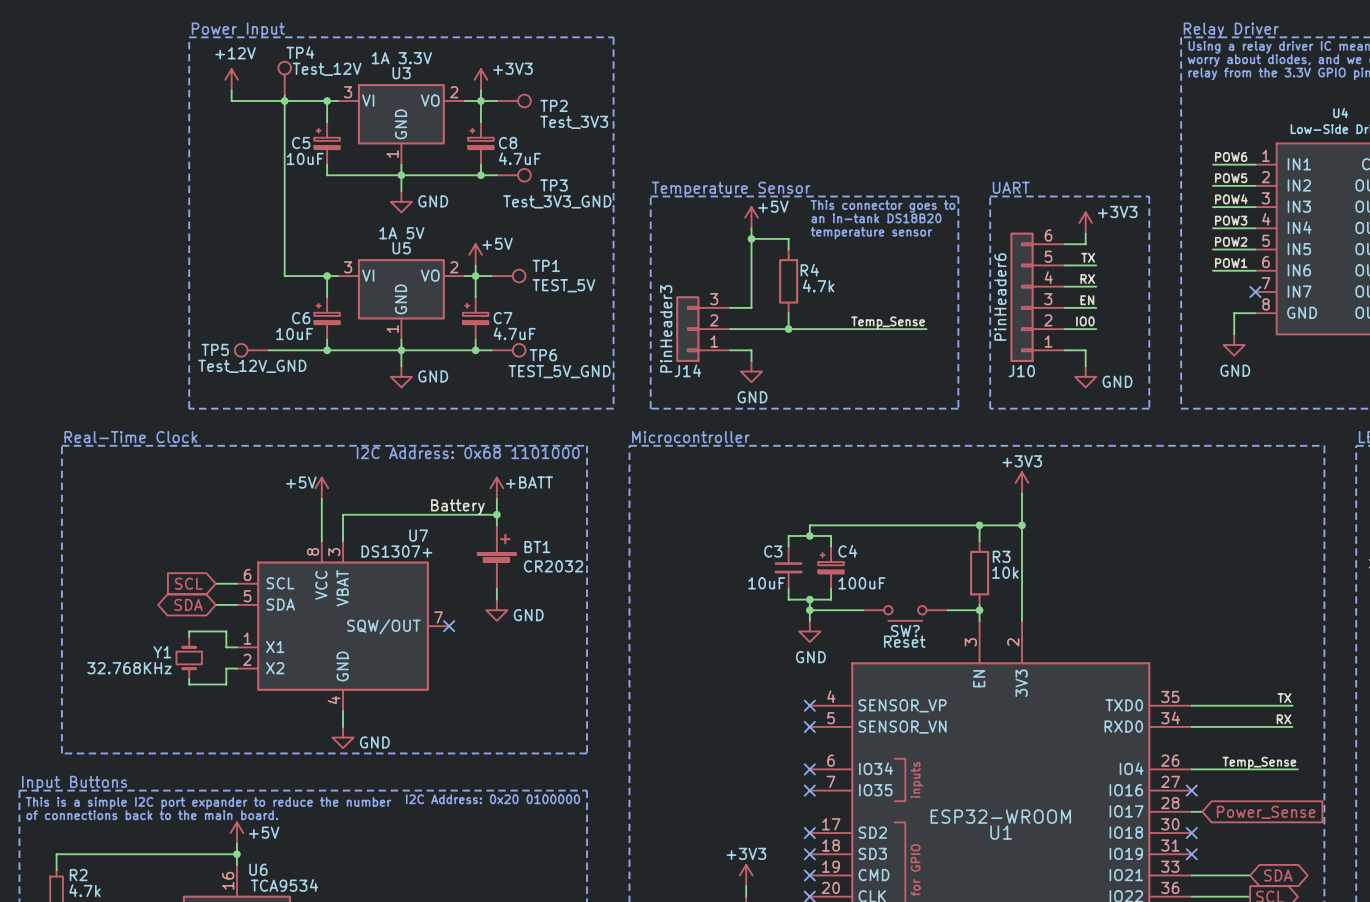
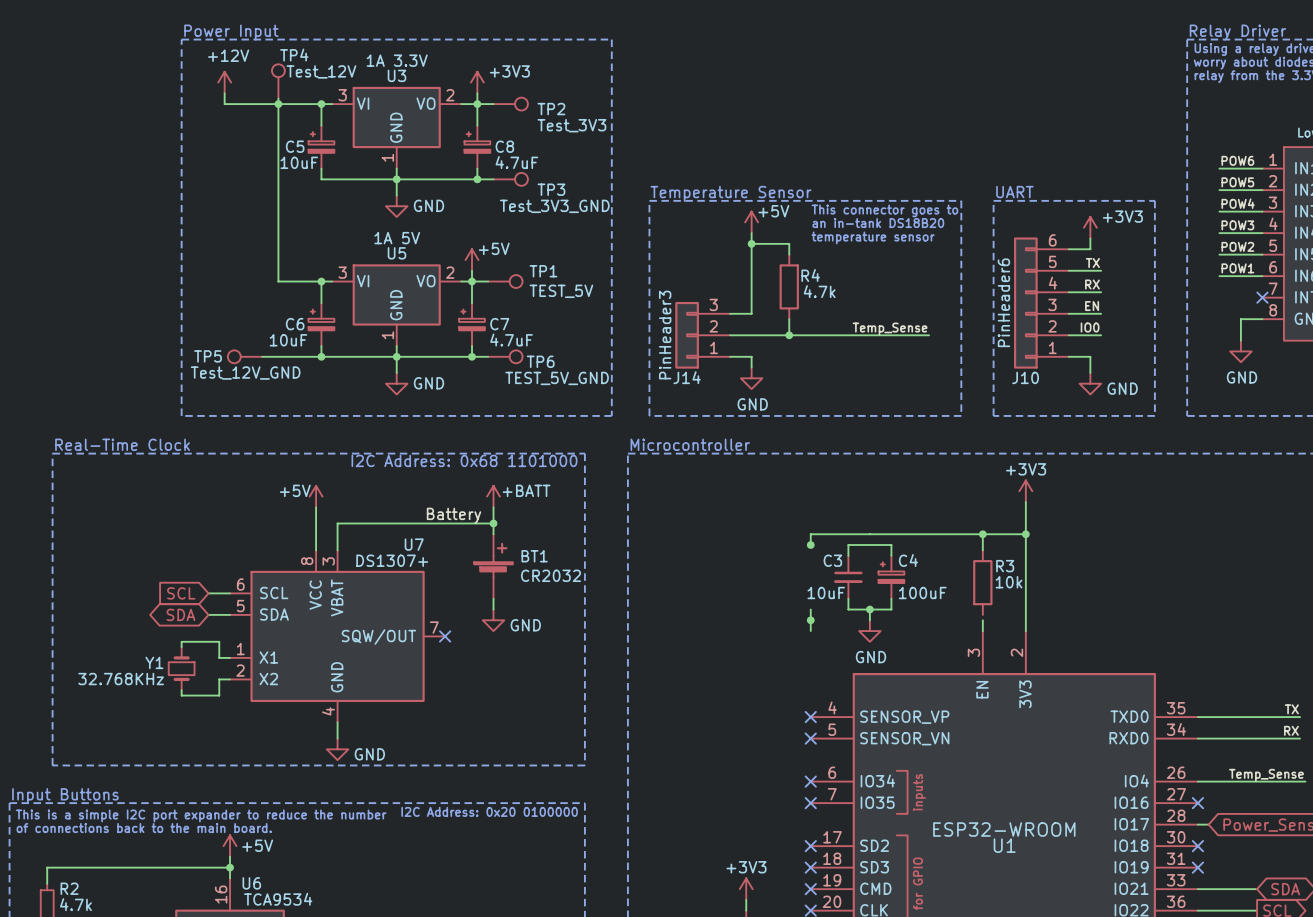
wire: (788, 546) (788, 535) (831, 535) (831, 546) -> (848, 555) (848, 545) (891, 545) (891, 555)
C3 position: (788, 567) -> (848, 577)
C4 position: (831, 567) -> (891, 577)
wire: (788, 589) (788, 599) (831, 599) (831, 589) -> (848, 598) (848, 609) (891, 609) (891, 598)
junction: (809, 599) -> none
wire: none -> (869, 609) (869, 620)
junction: none -> (869, 609)
wire: (979, 604) (979, 610) (947, 610) -> none
wire: (809, 610) (862, 610) -> none
junction: (979, 610) -> none
SW?: Reset (905, 613) -> none
power symbol position: GND (809, 631) -> GND (869, 631)

